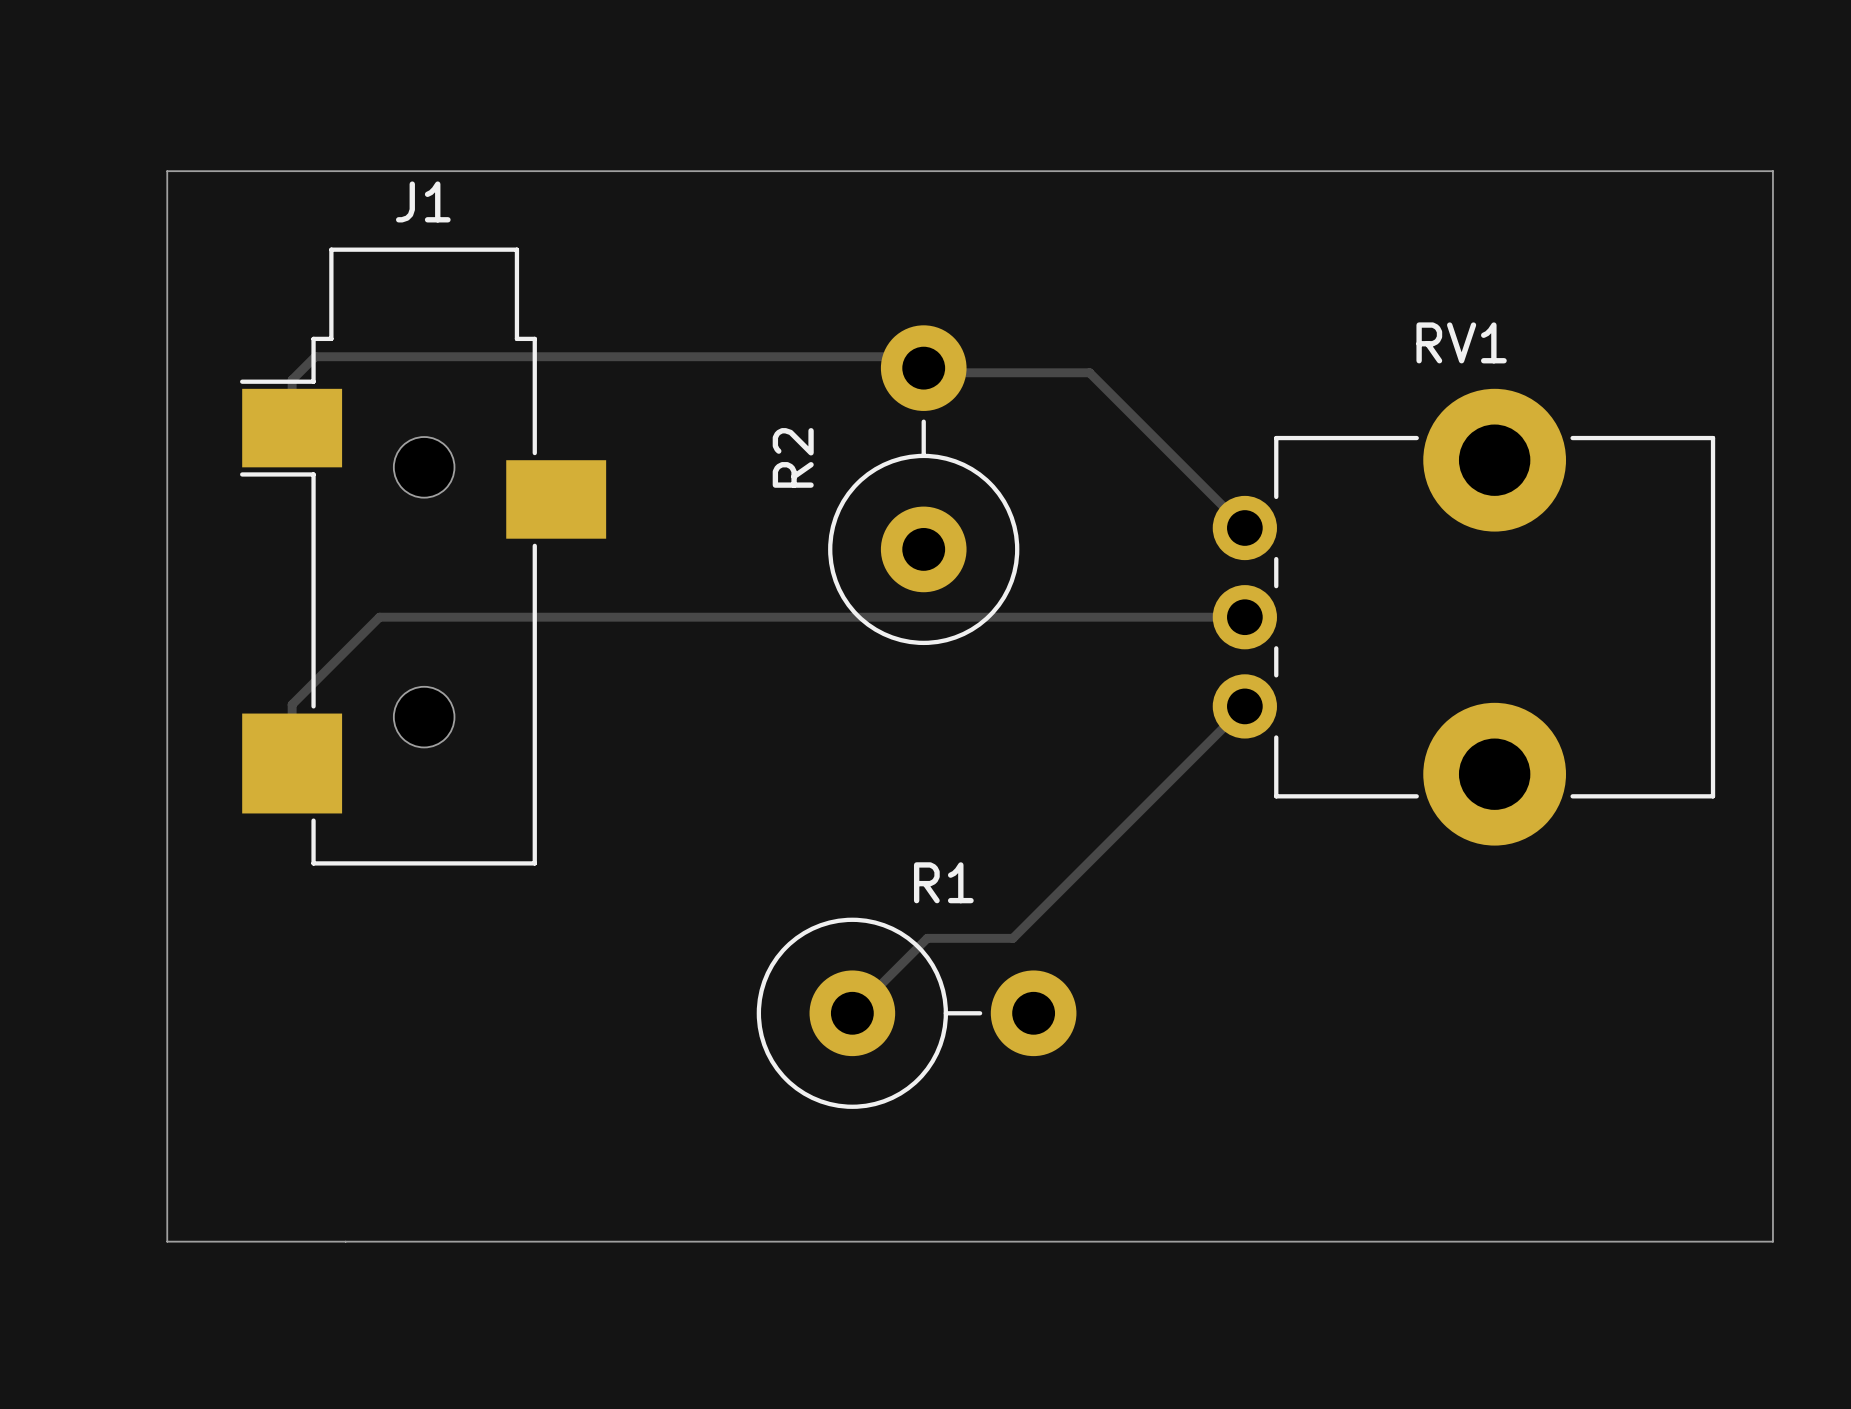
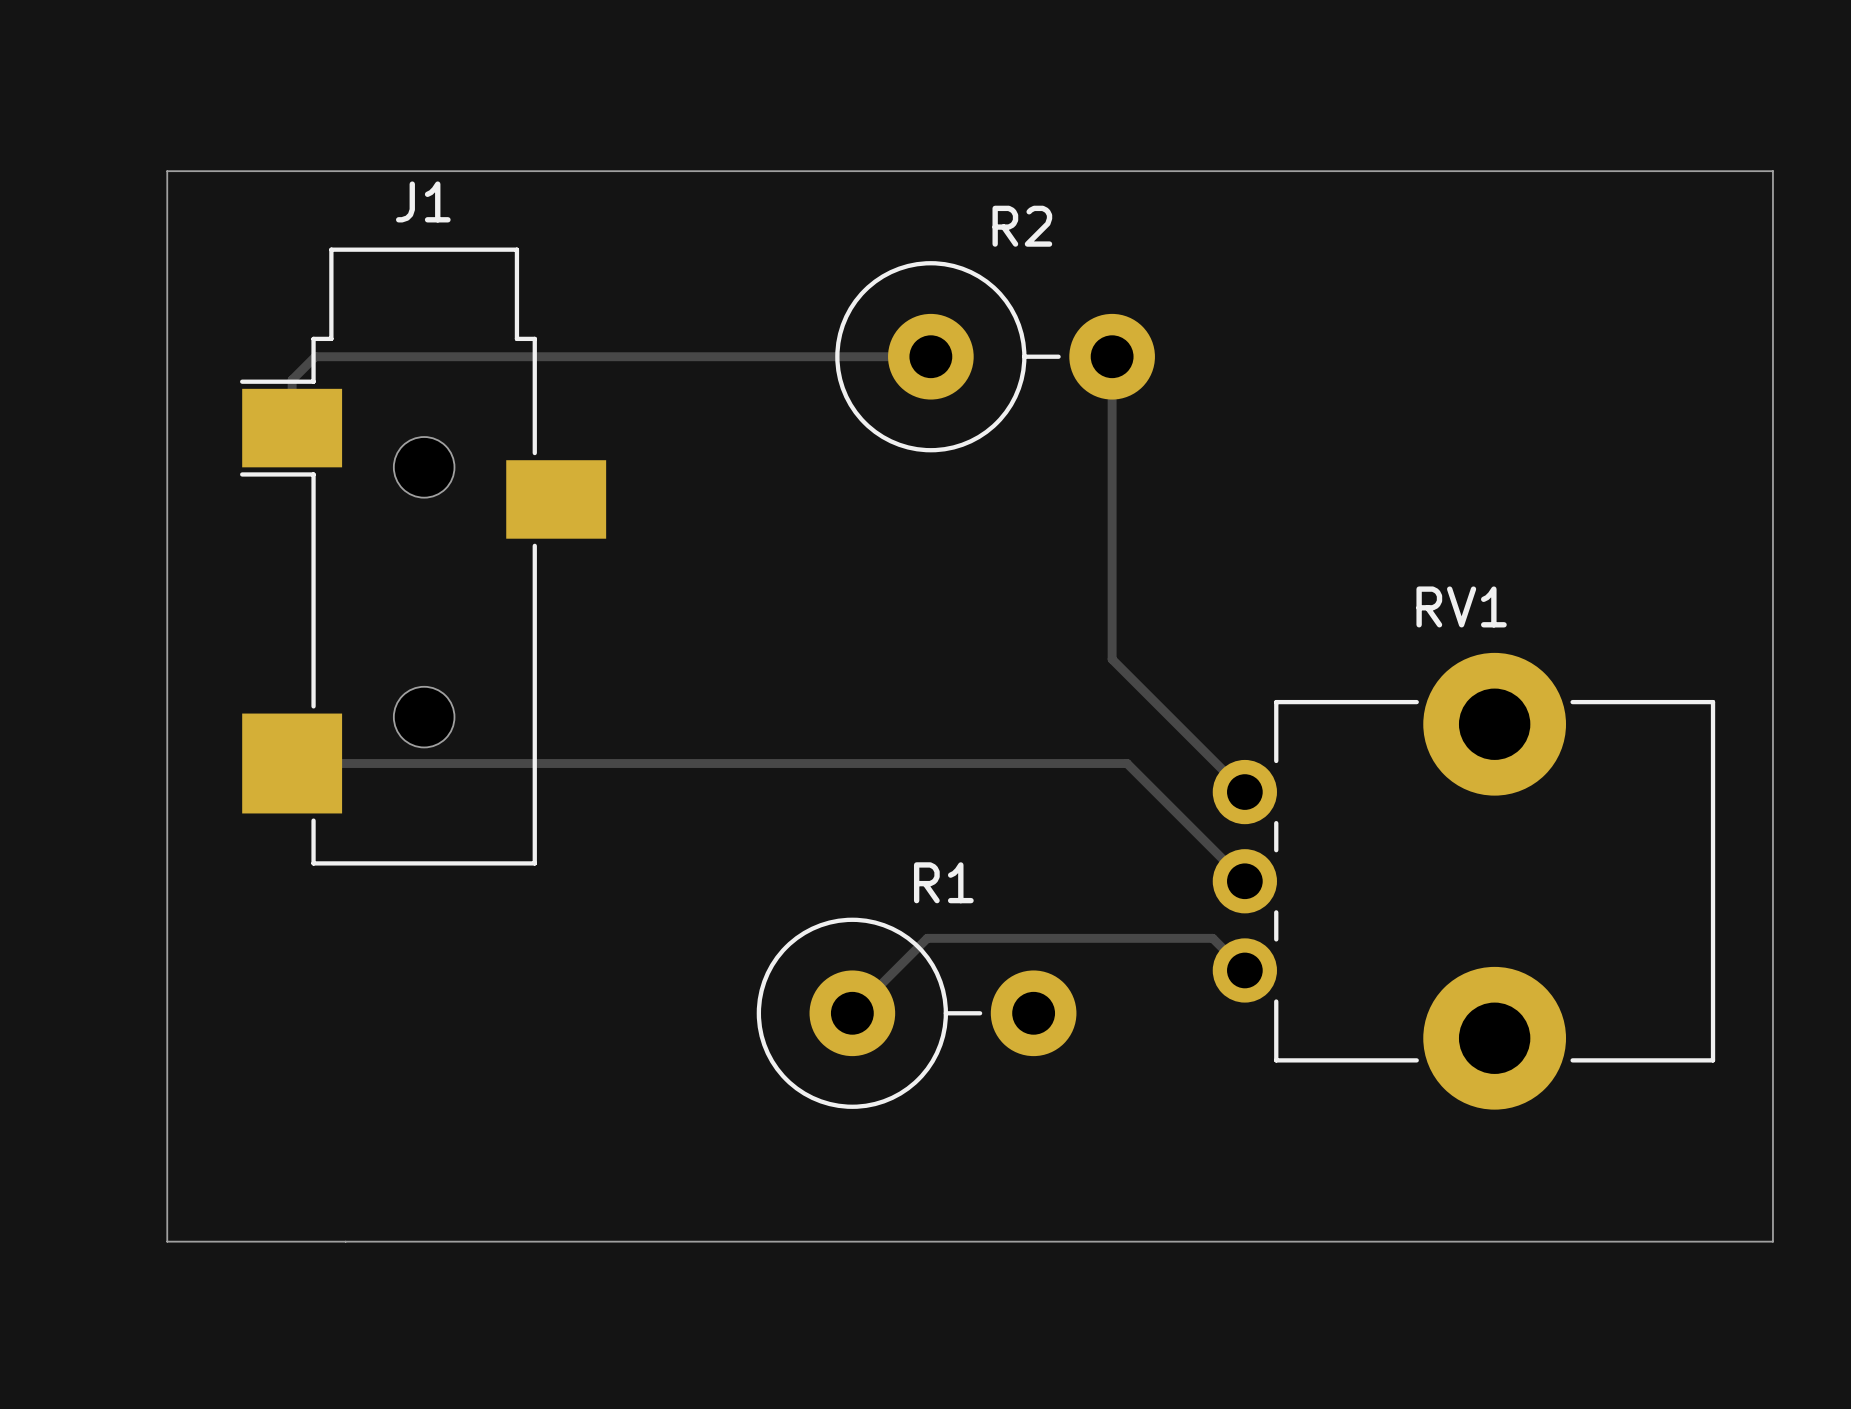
track: none -> (1112, 356) (1112, 659) (1244, 792)
track: (923, 372) (1089, 372) (1244, 528) -> none
R2 rotation: 0° (923, 485) -> 90° clockwise (995, 356)
track: (1244, 617) (379, 617) (292, 704) (292, 763) -> (1244, 881) (1127, 763) (292, 763)
RV1 position: (1463, 617) -> (1463, 881)
track: (1244, 706) (1012, 938) -> (1244, 970) (1212, 938) (1012, 938)

